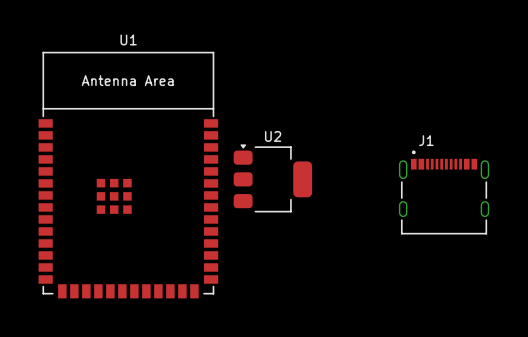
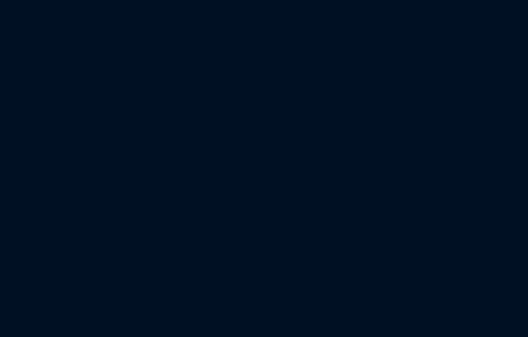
U1: (128, 175) -> none
U2: (272, 178) -> none
J1: (444, 192) -> none

